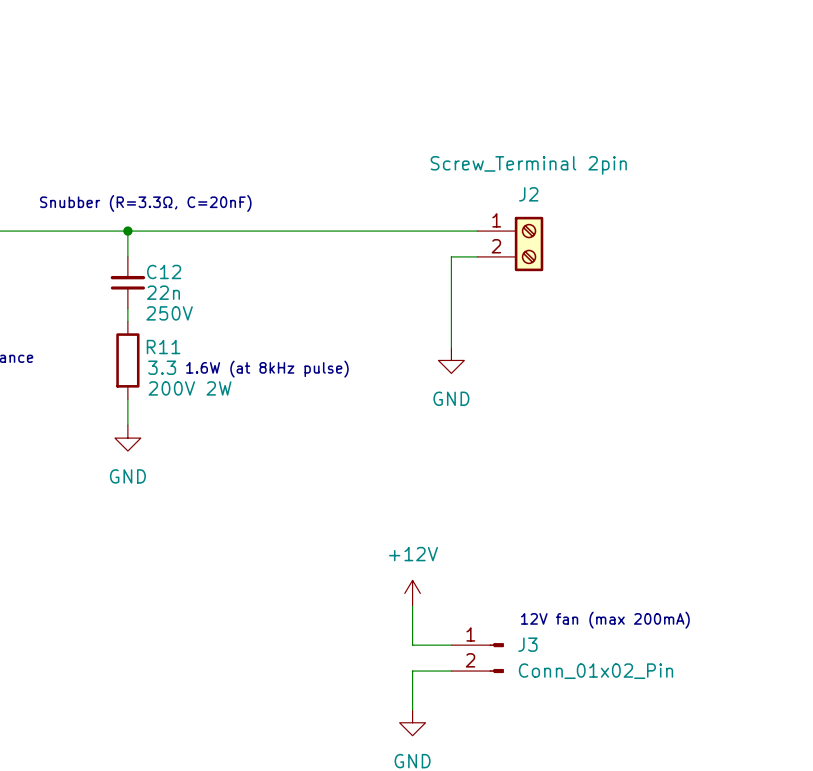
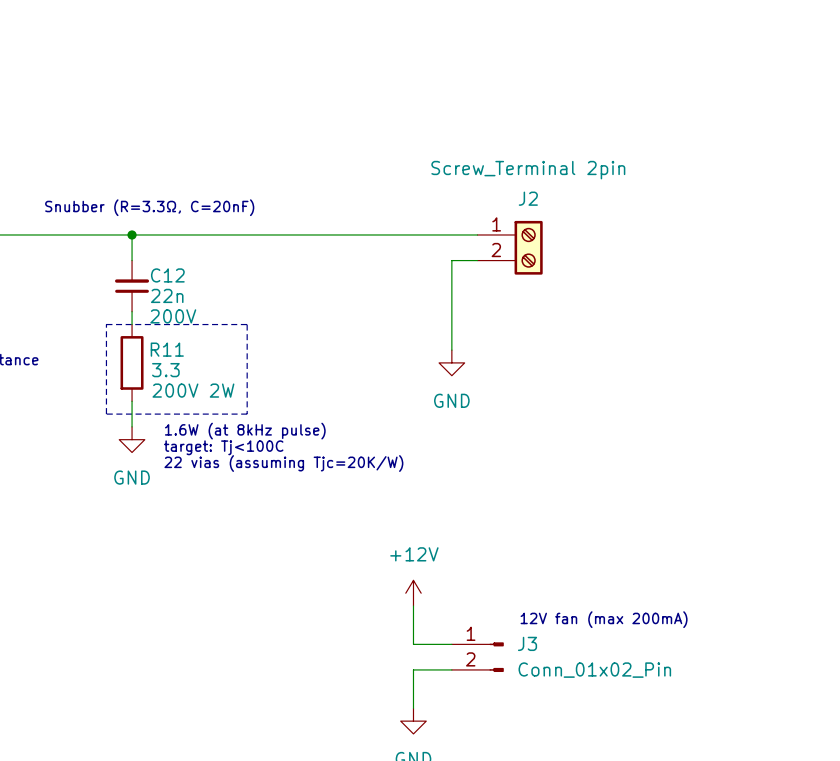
C12 text: 250V (169, 313) -> 200V (173, 316)
line: none -> (106, 324) (247, 324) (247, 414) (106, 414) (106, 324)
text position: 1.6W (at 8kHz pulse) (267, 369) -> 1.6W (at 8kHz pulse) (245, 431)
text: none -> target: Tj<100C (223, 447)
text: none -> 22 vias (assuming Tjc=20K/W) (283, 463)

